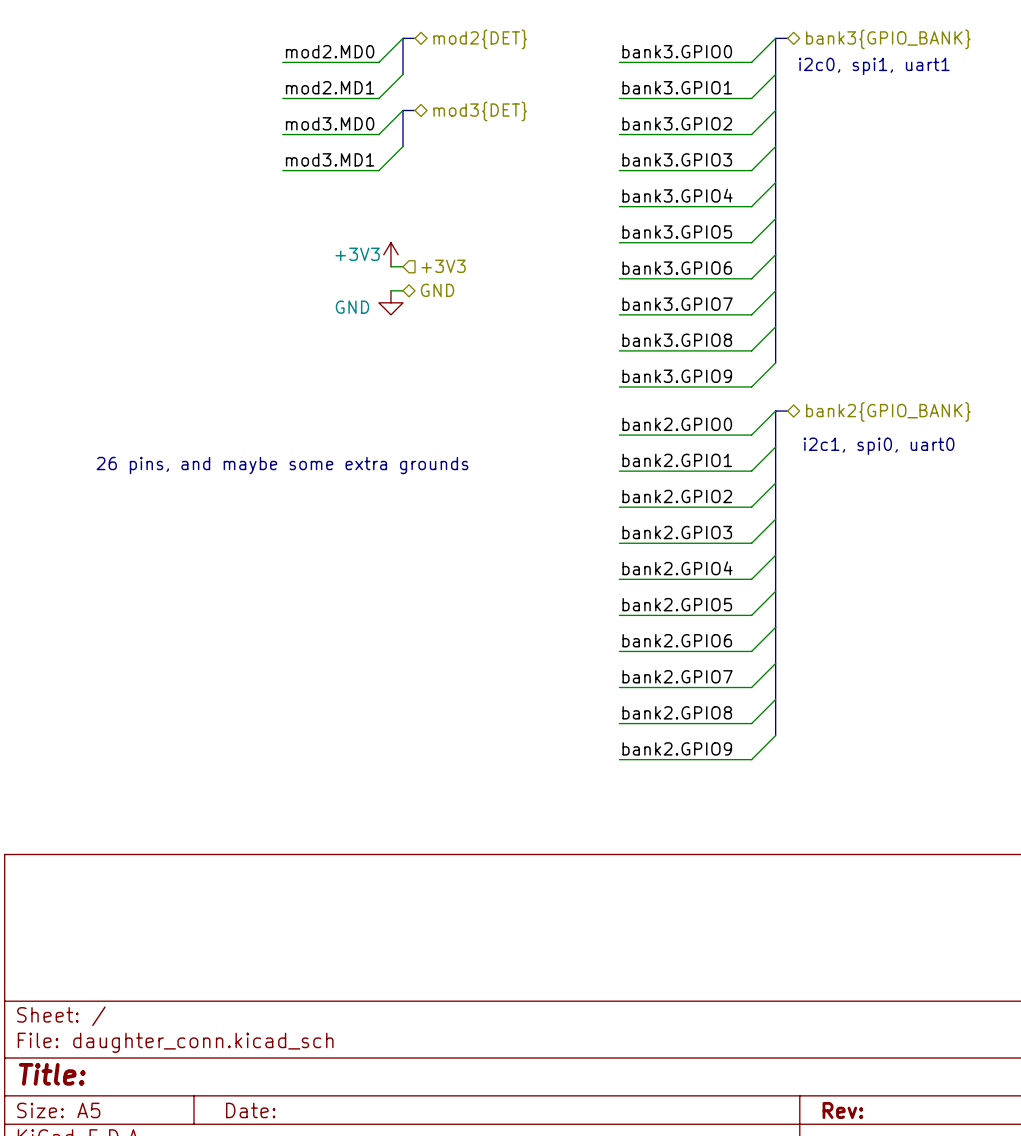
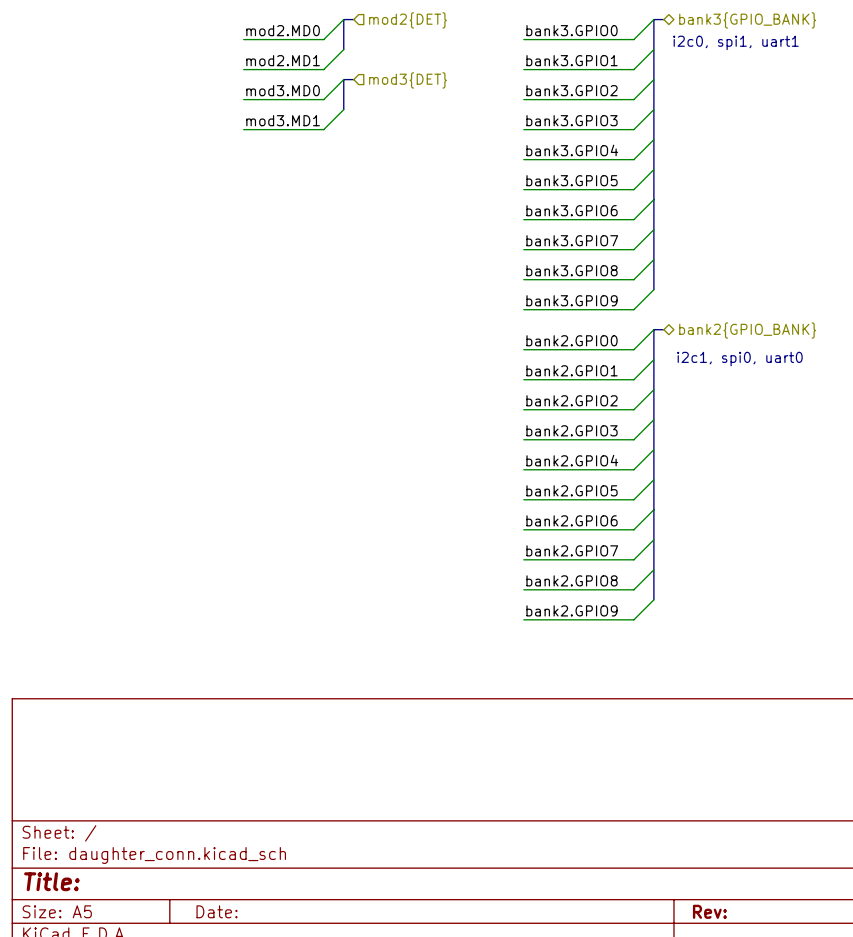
hierarchical label shape: bidirectional (480, 39) -> input (407, 20)
hierarchical label shape: bidirectional (480, 111) -> input (407, 80)
power symbol: +3V3 (390, 254) -> none
wire: (390, 266) (402, 266) -> none
hierarchical label: +3V3 (443, 266) -> none
wire: (390, 290) (402, 290) -> none
hierarchical label: GND (437, 290) -> none
power symbol: GND (390, 302) -> none
text: 26 pins, and maybe some extra grounds (282, 465) -> none

